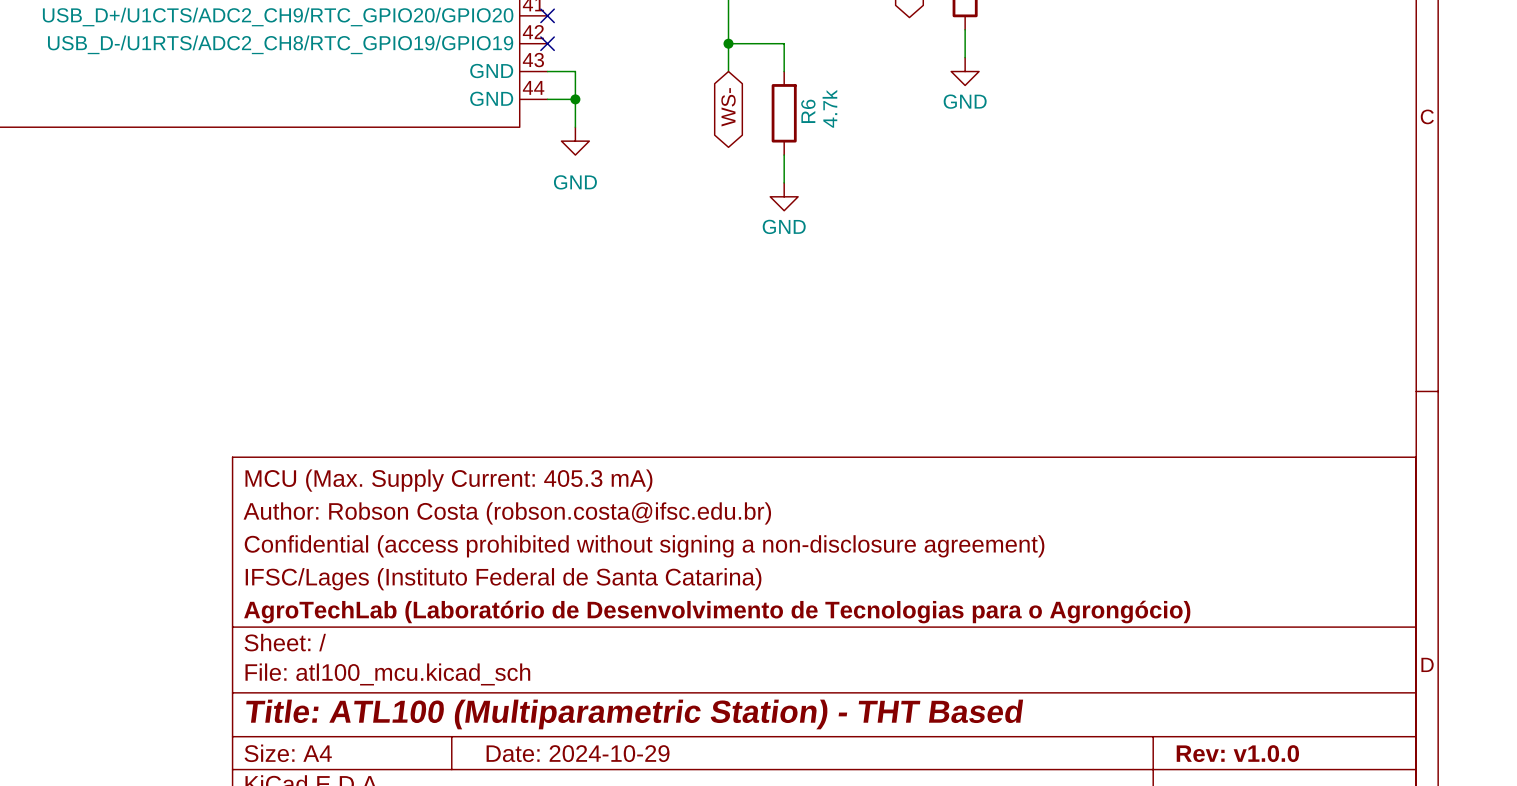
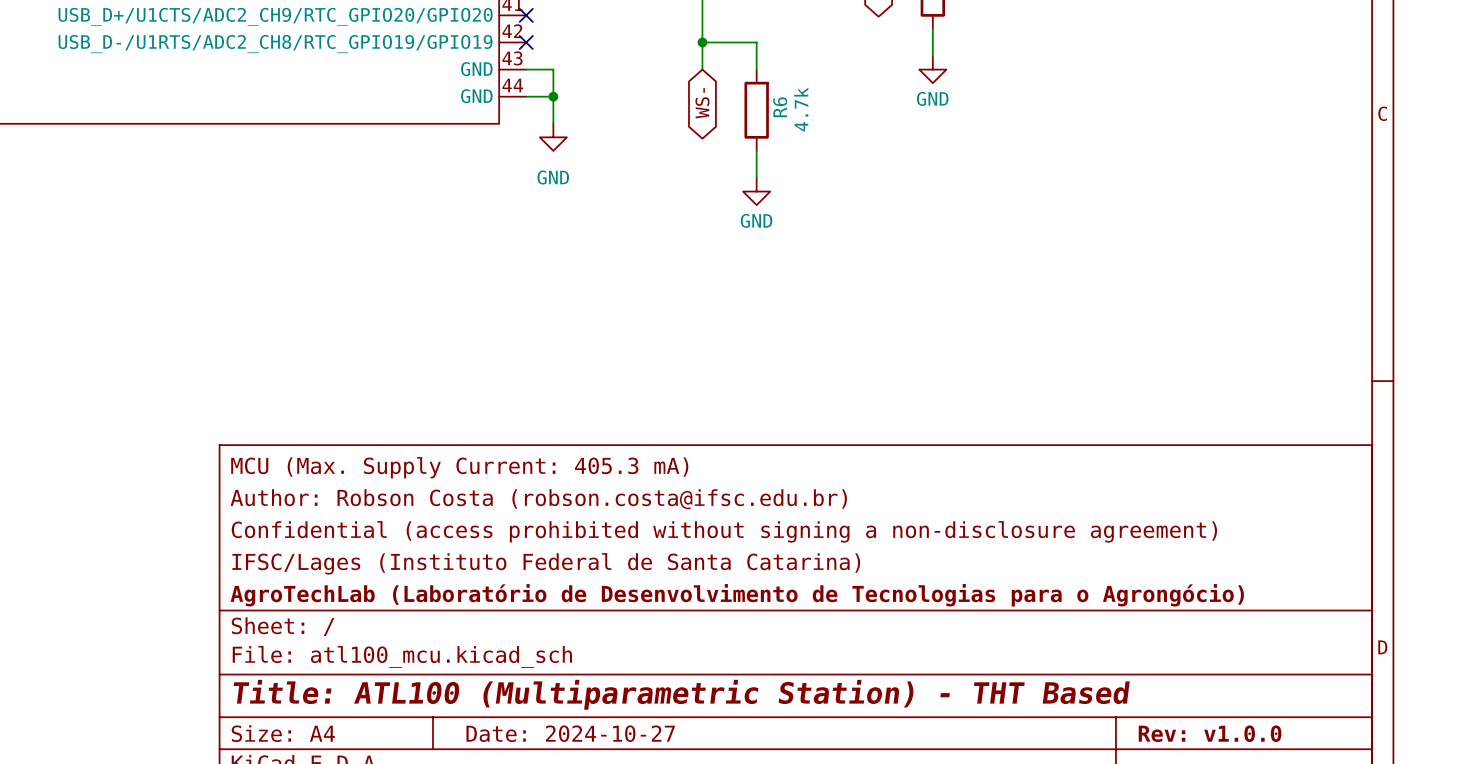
title block: Date: 2024-10-29 (578, 753) -> Date: 2024-10-27 (570, 733)

